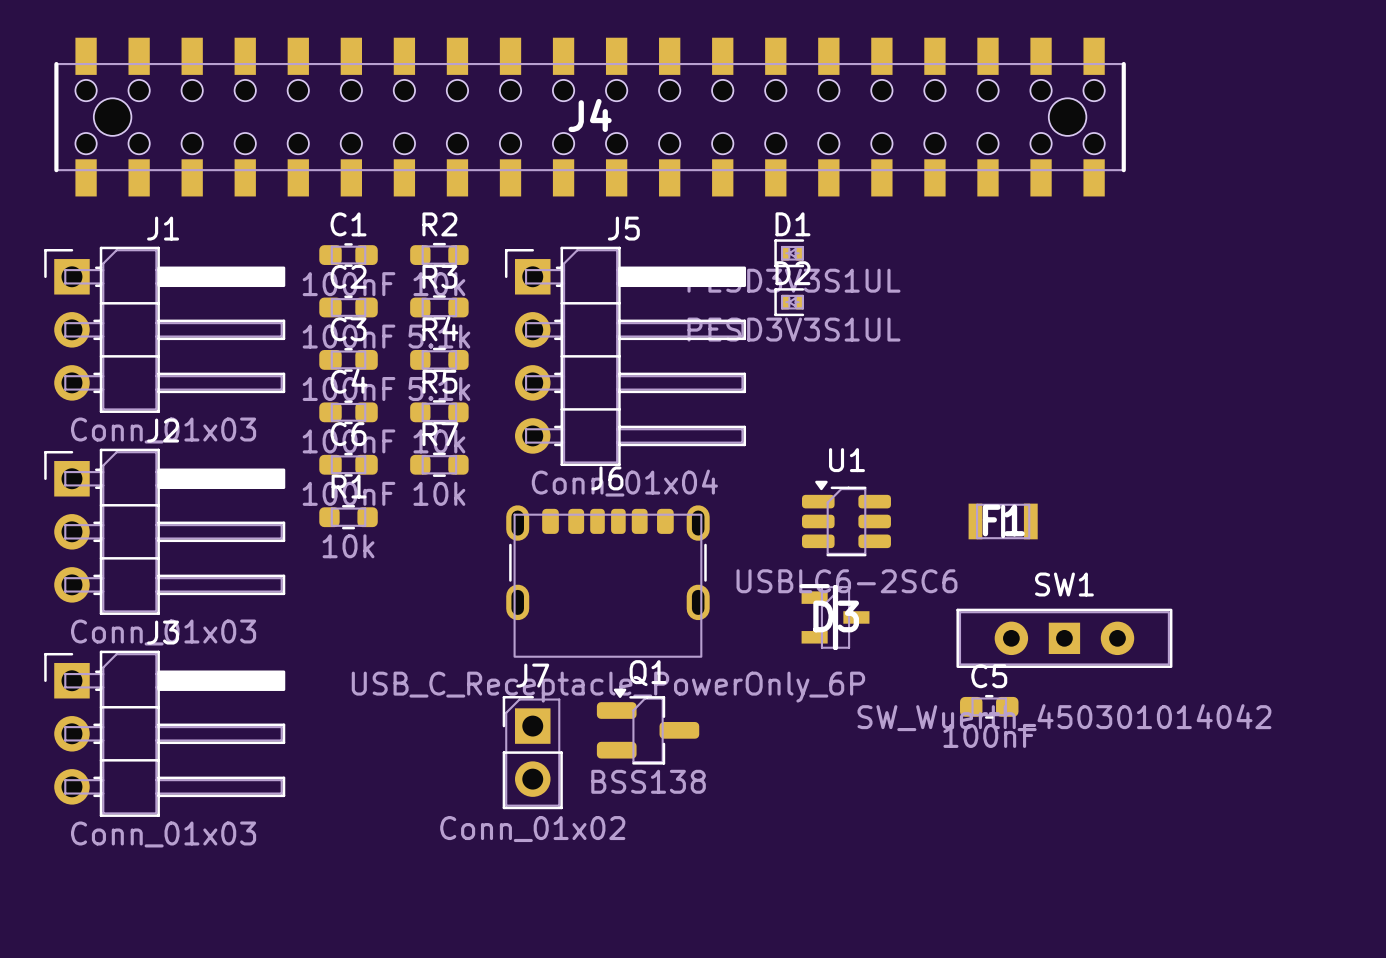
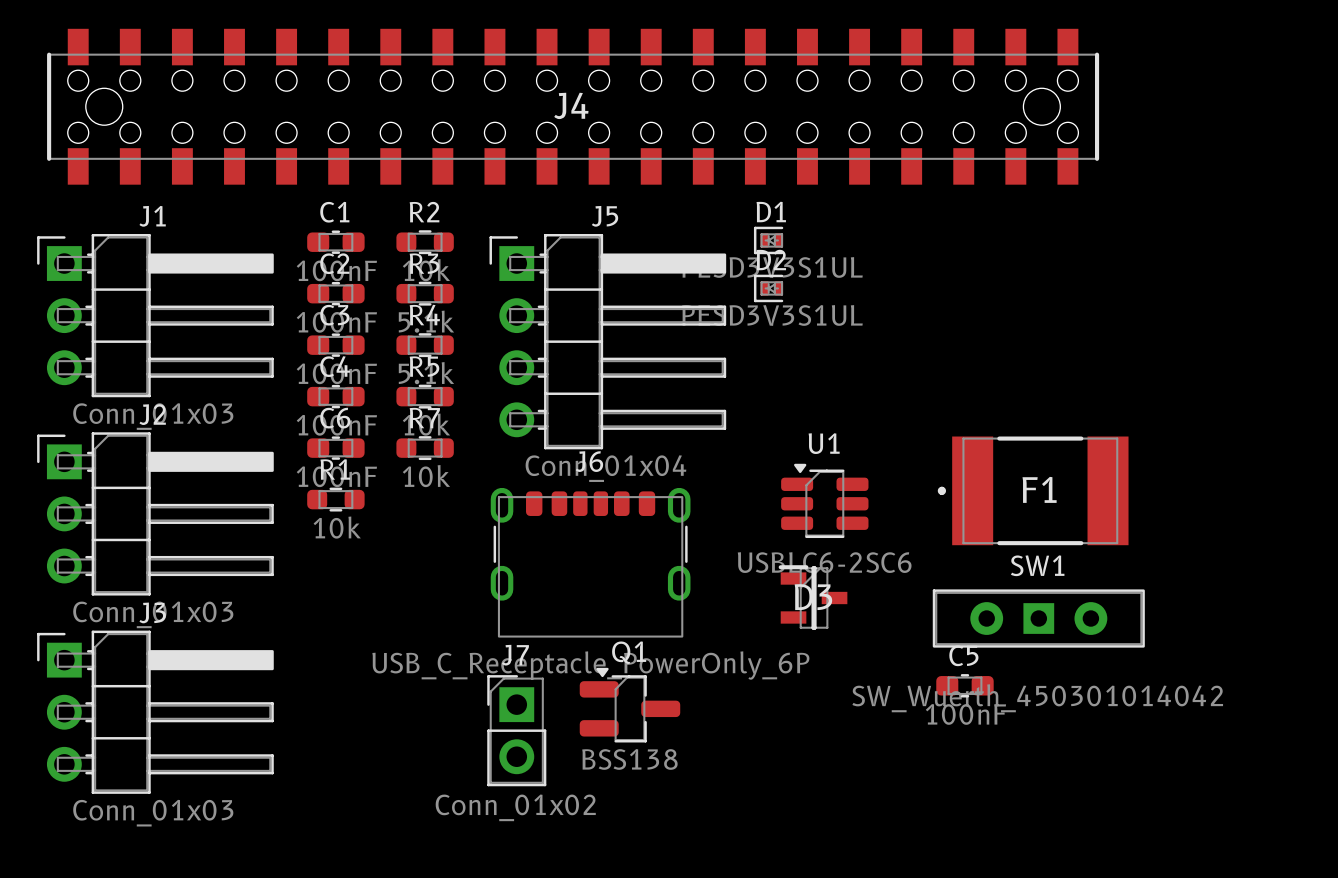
F1 footprint: [968, 503, 1038, 540] -> [937, 436, 1129, 546]

